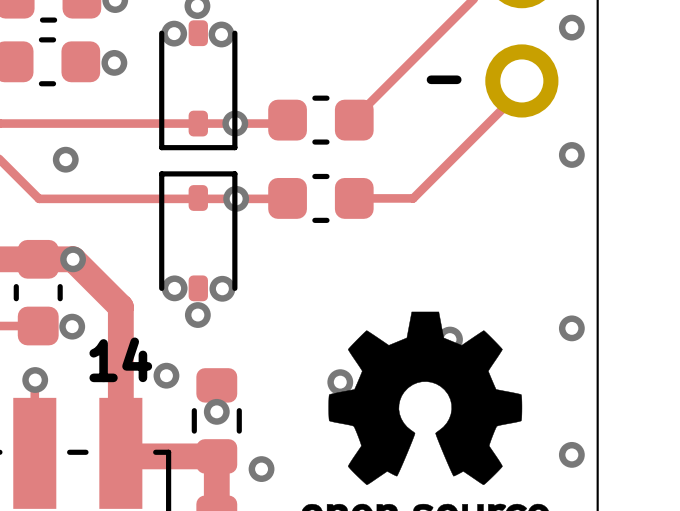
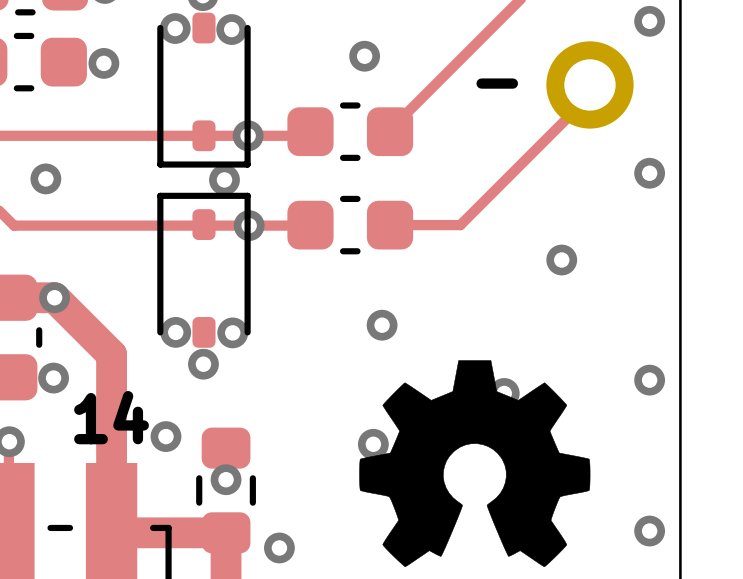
via: none -> (364, 56)
via: none -> (224, 179)
via: none -> (561, 260)
via: none -> (382, 325)

